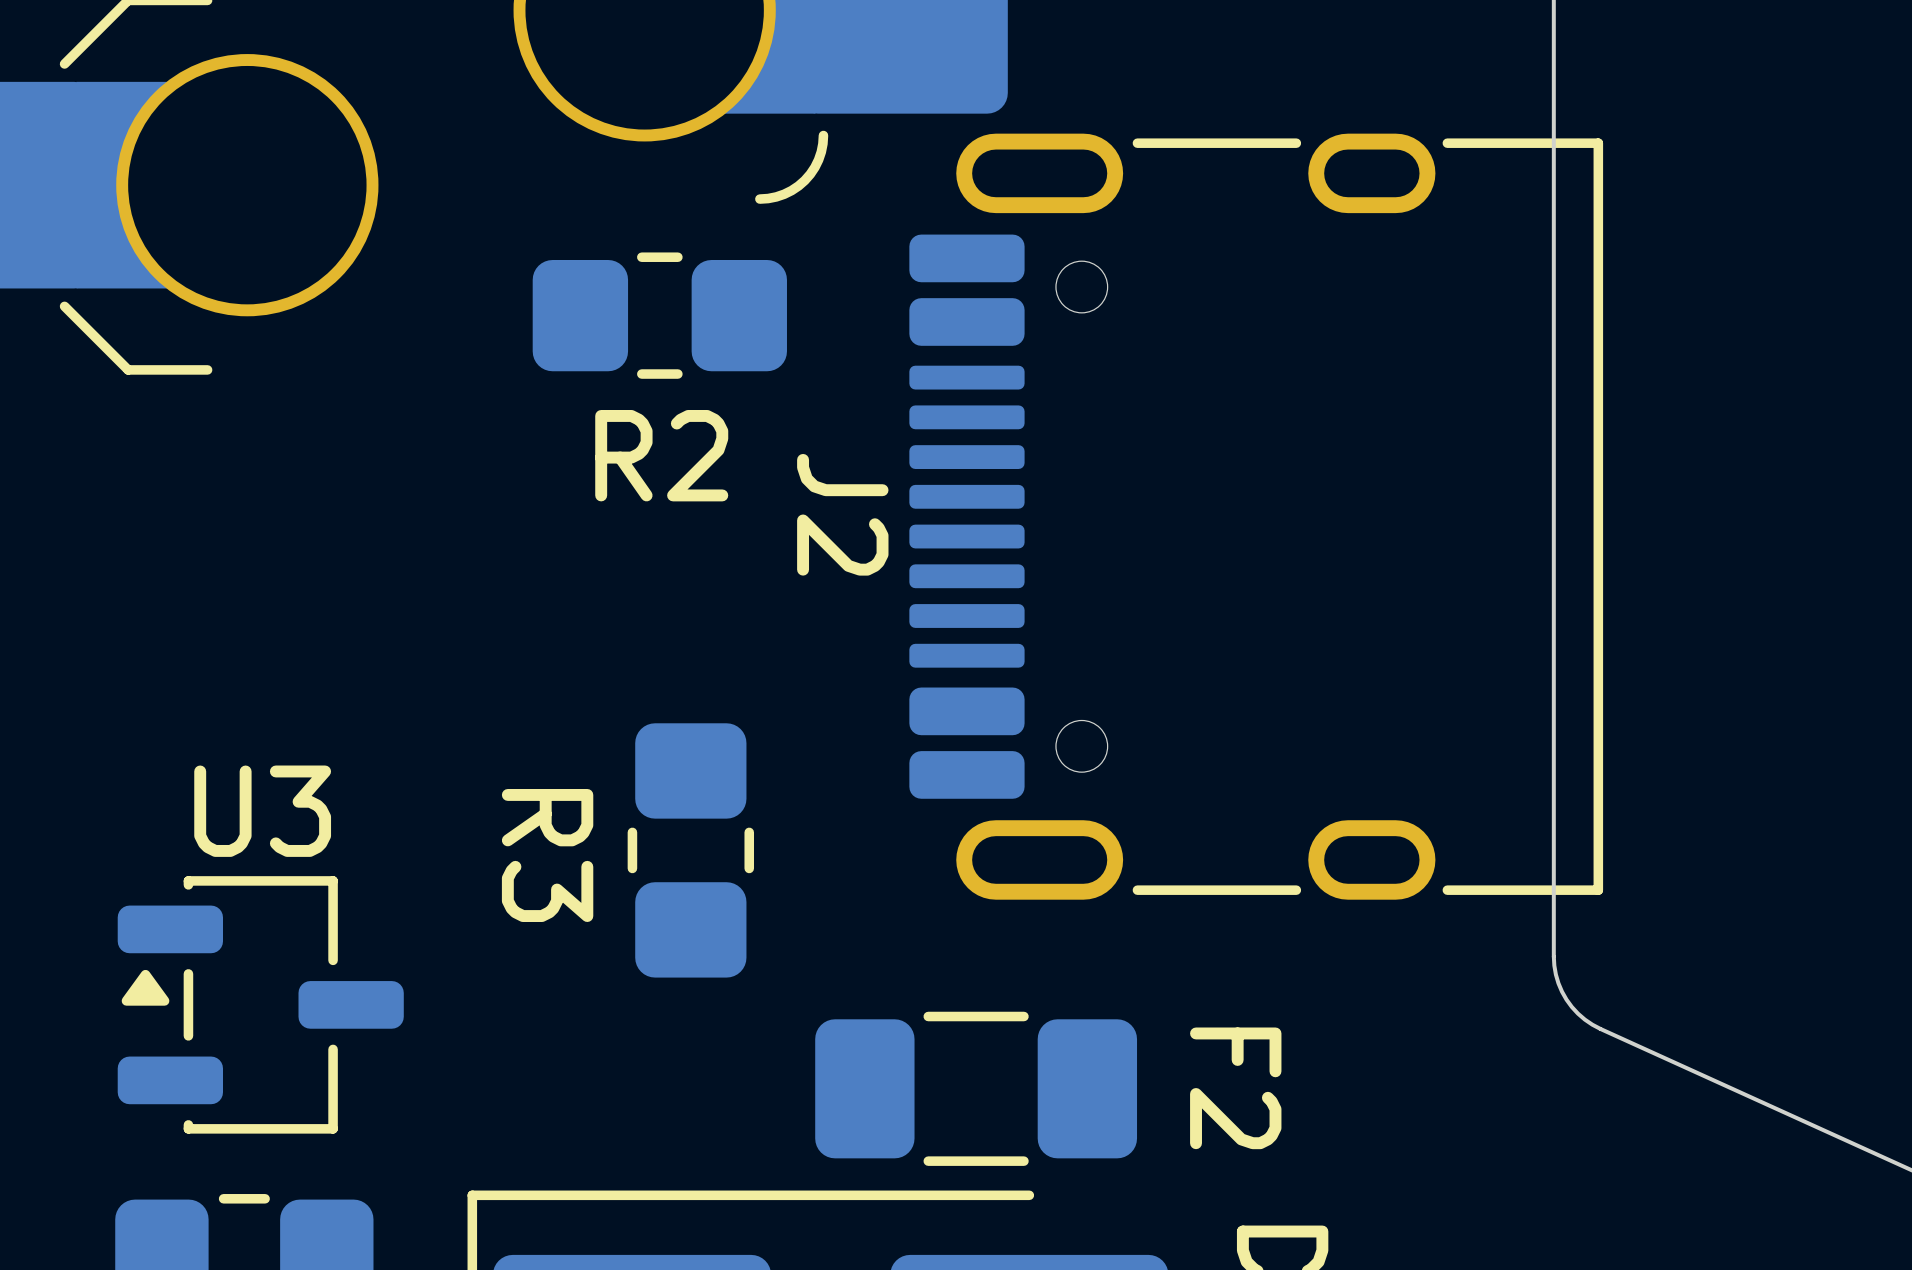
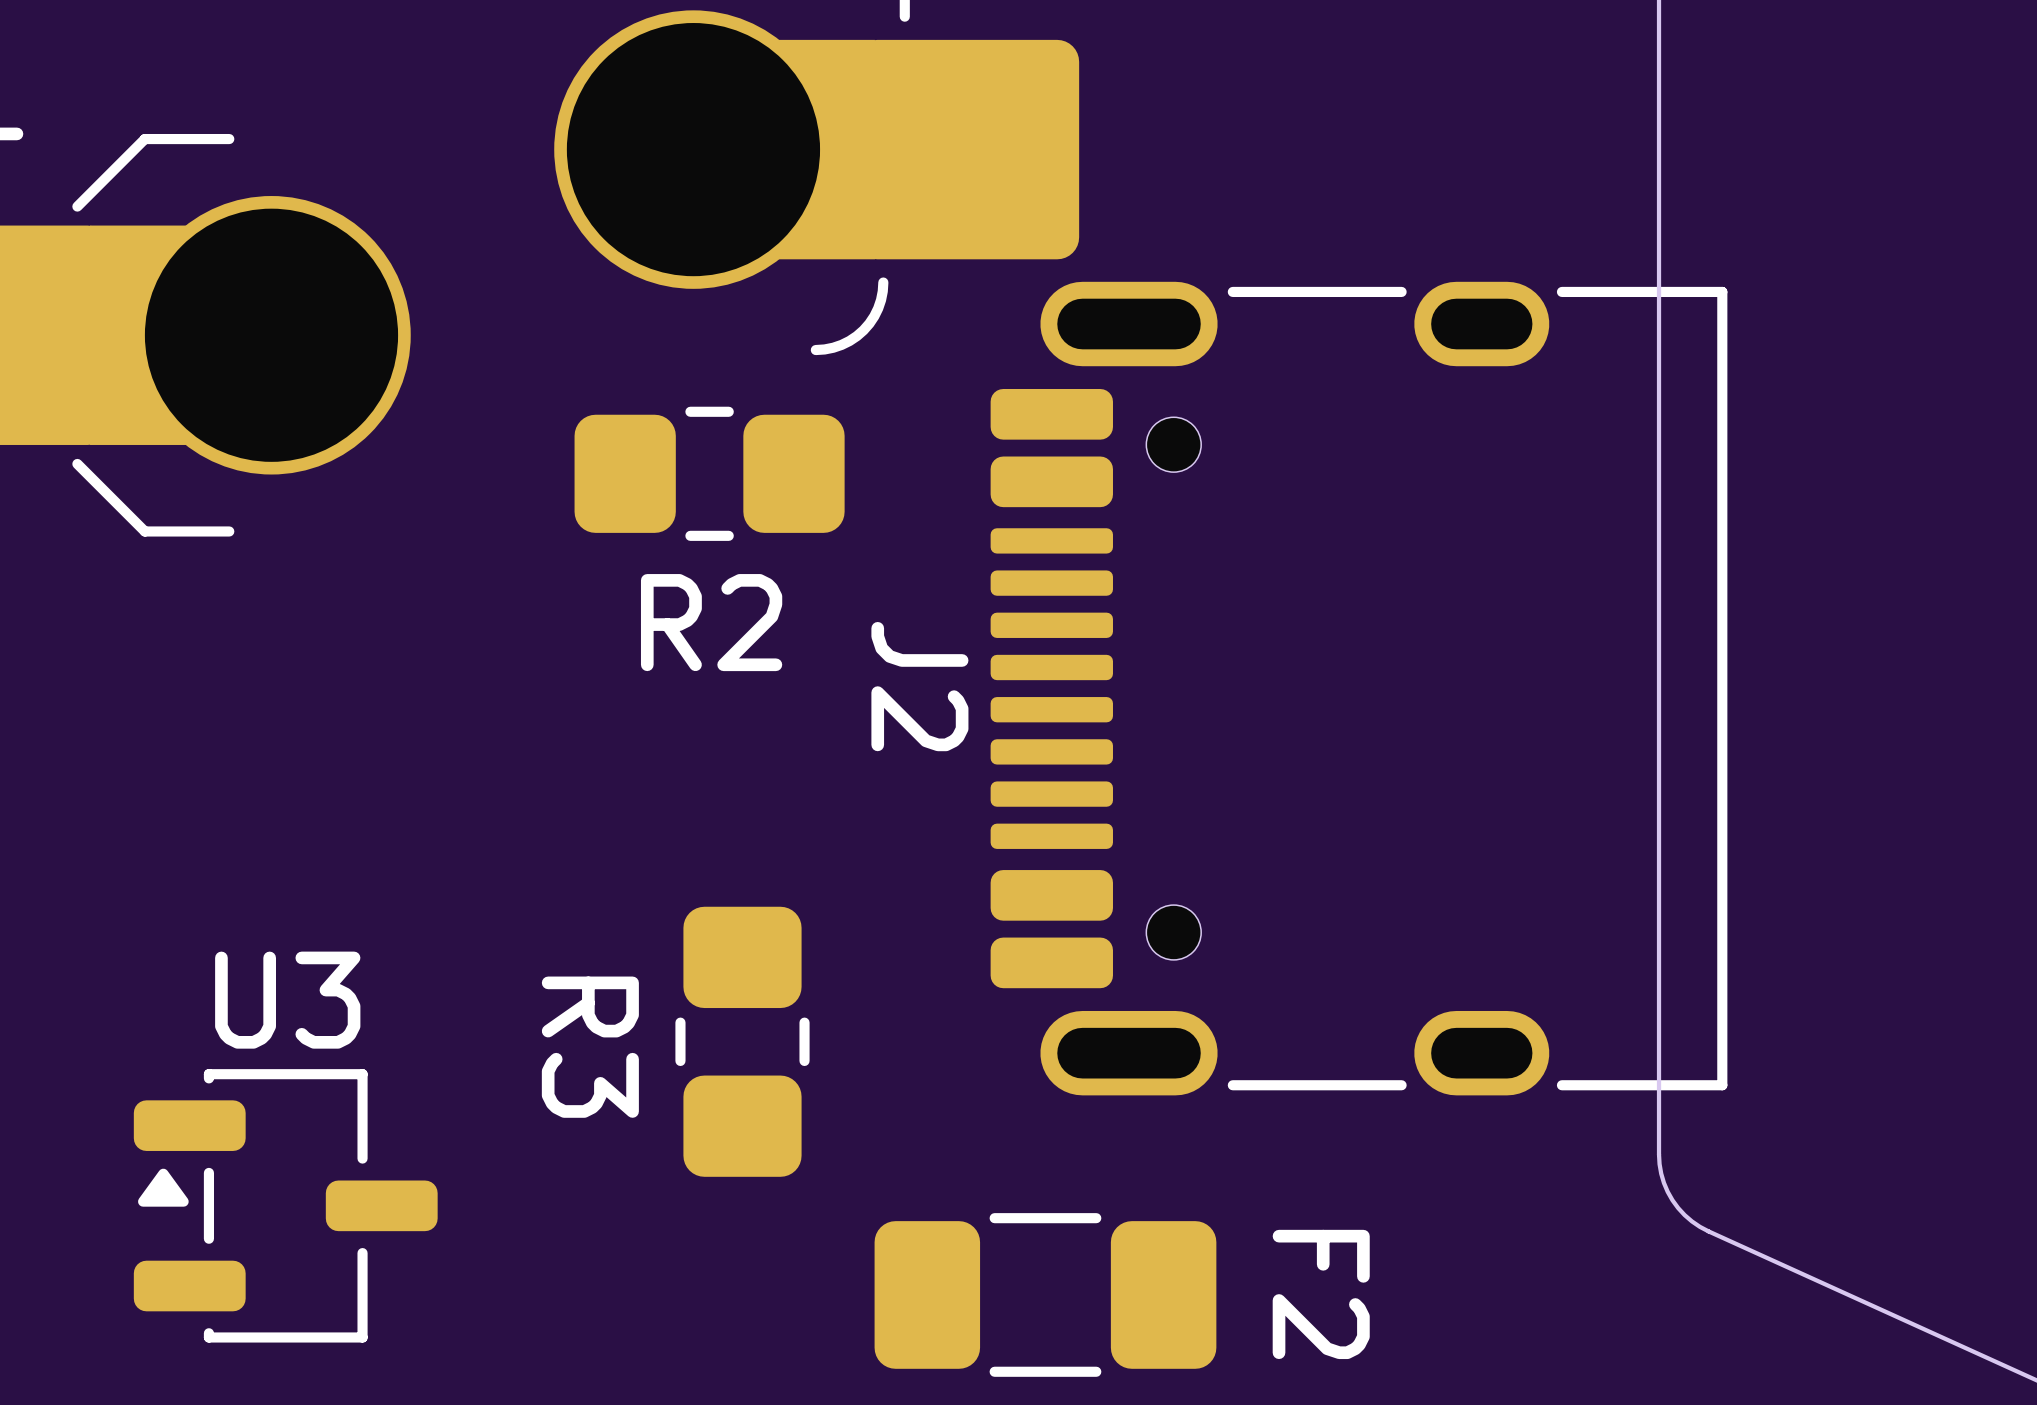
J2 position: (1256, 516) -> (1358, 688)

